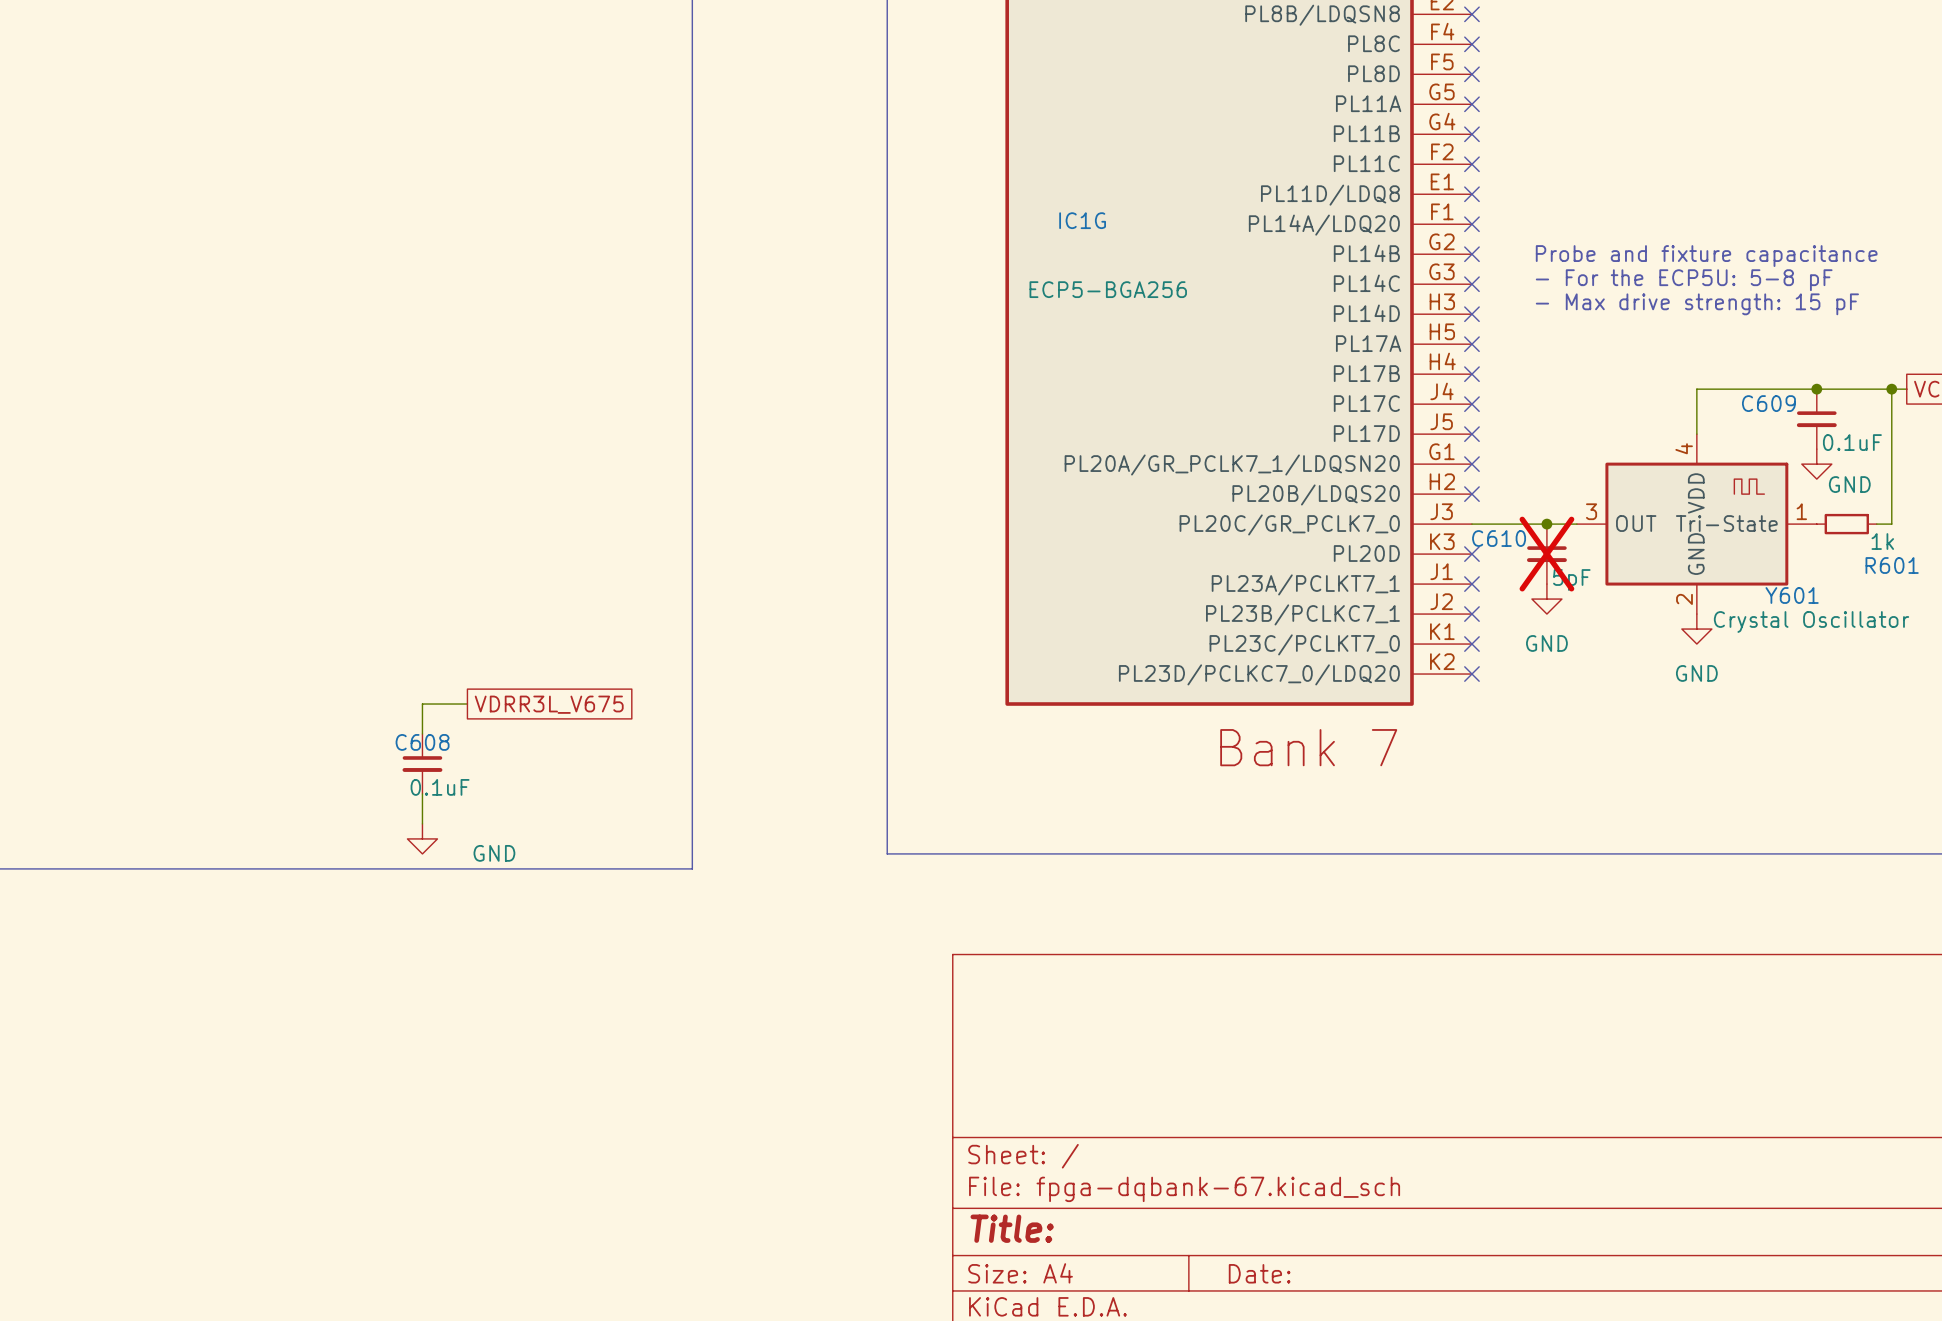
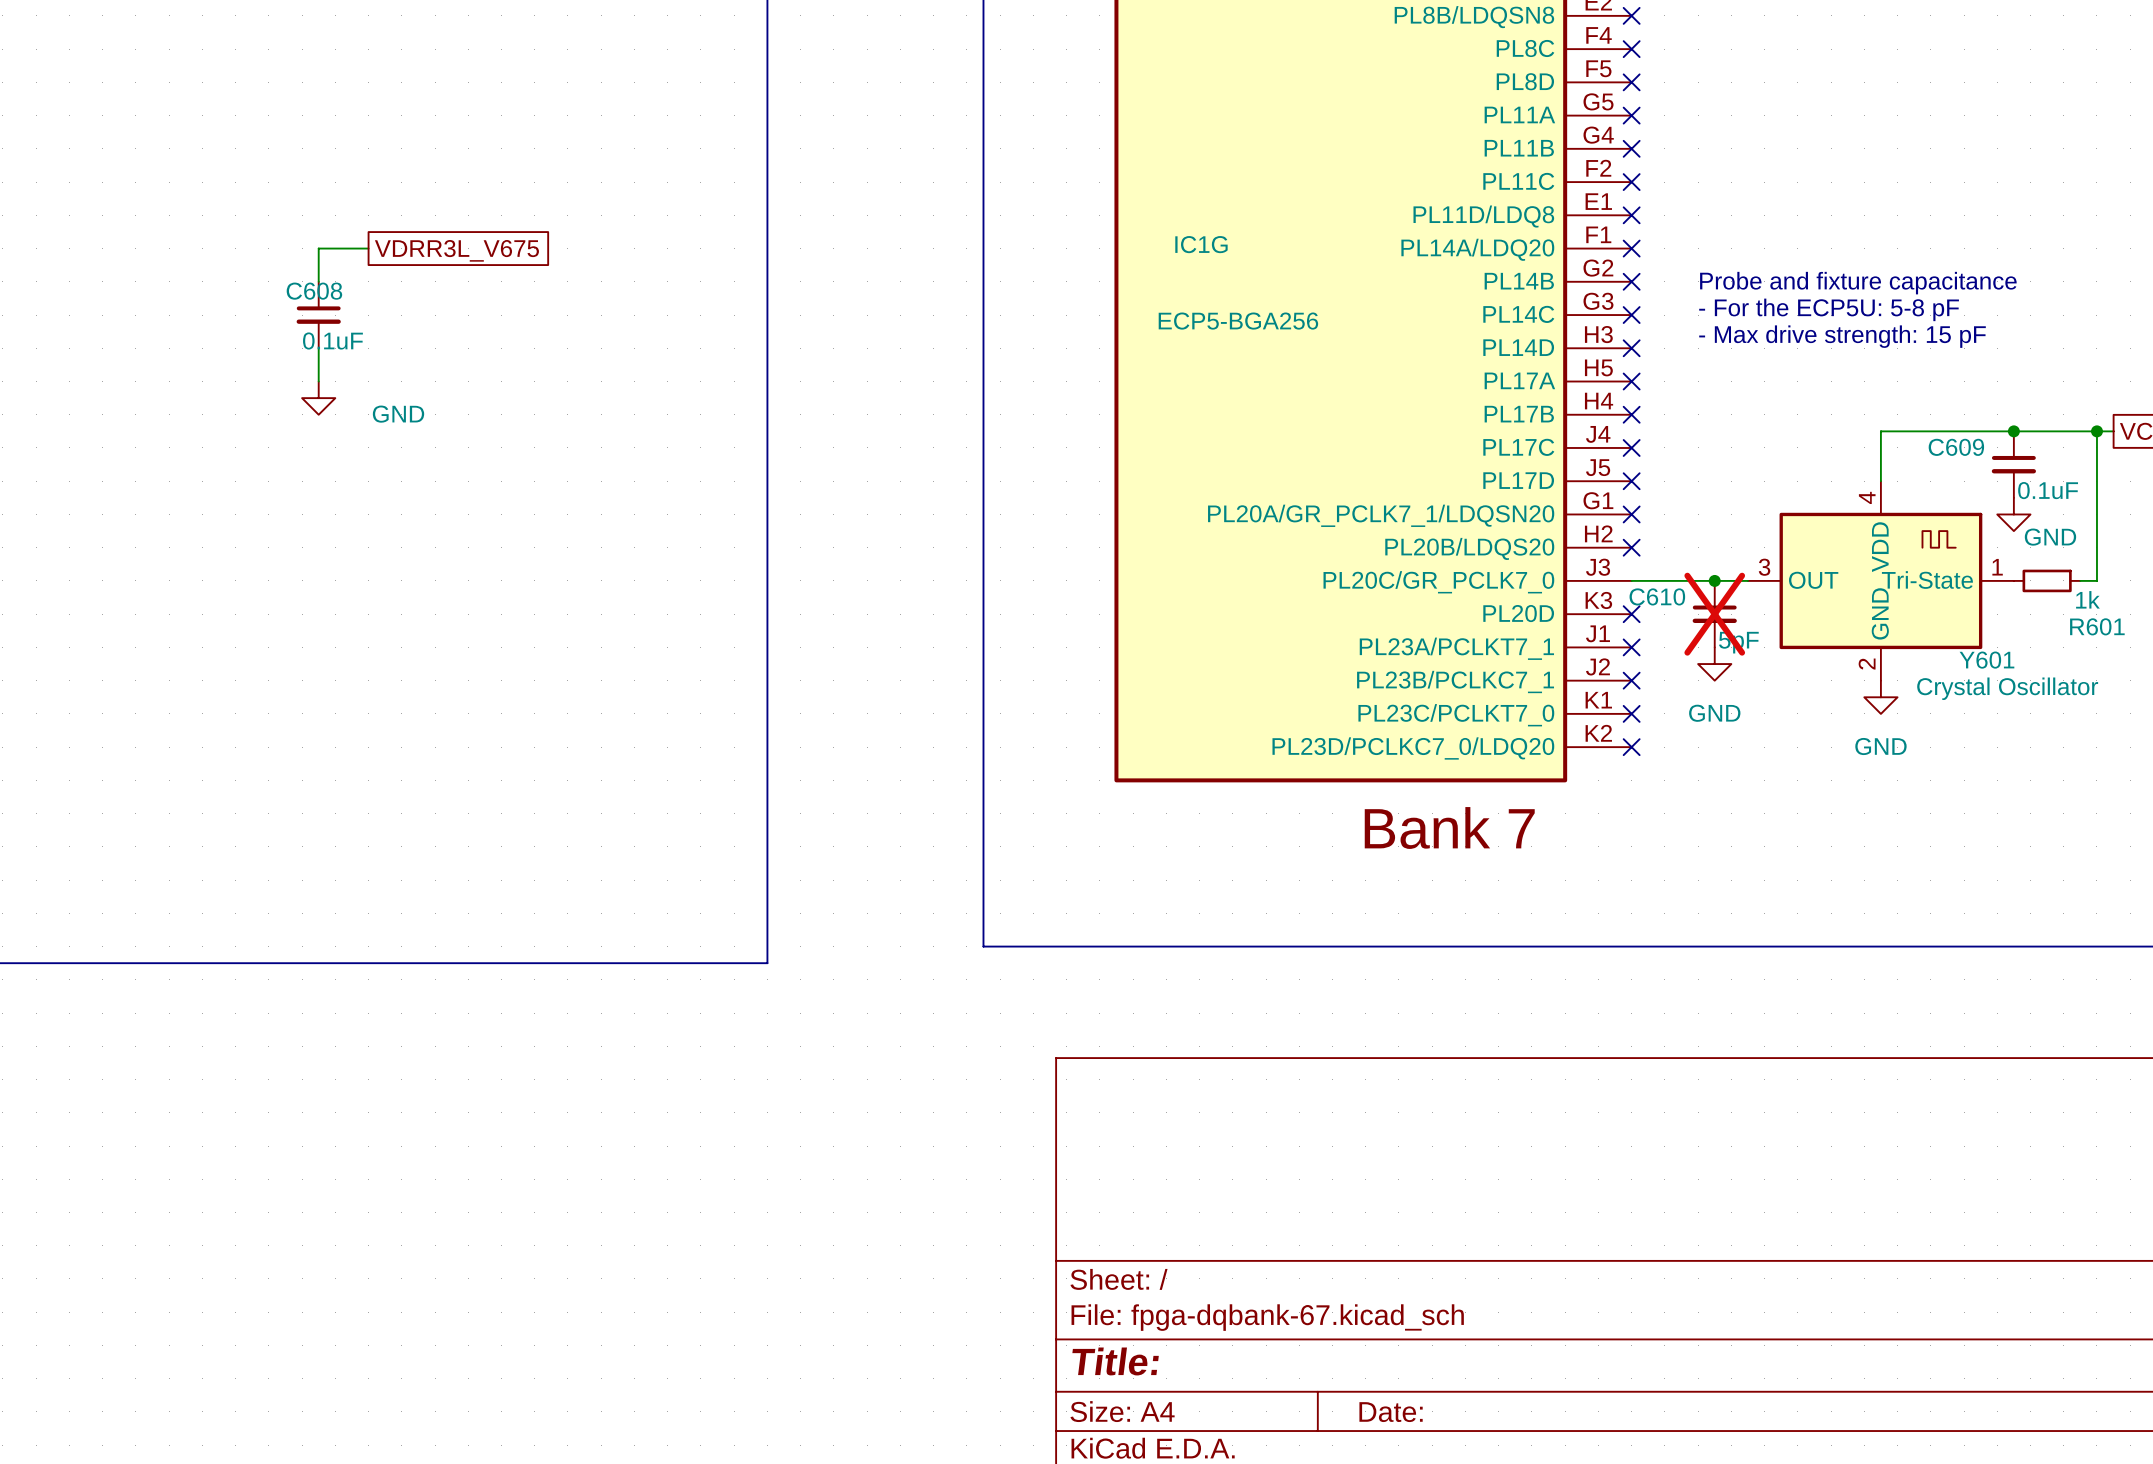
wire: none -> (368, 248) (318, 248) (318, 281)
global label: none -> VDRR3L_V675 (456, 250)
wire: none -> (318, 348) (318, 381)
power symbol: none -> GND (318, 398)
wire: (467, 704) (422, 704) (422, 733) -> none
global label: VDRR3L_V675 (549, 704) -> none
C608 position: (422, 763) -> (318, 315)
wire: (422, 793) (422, 823) -> none
power symbol: GND (422, 838) -> none

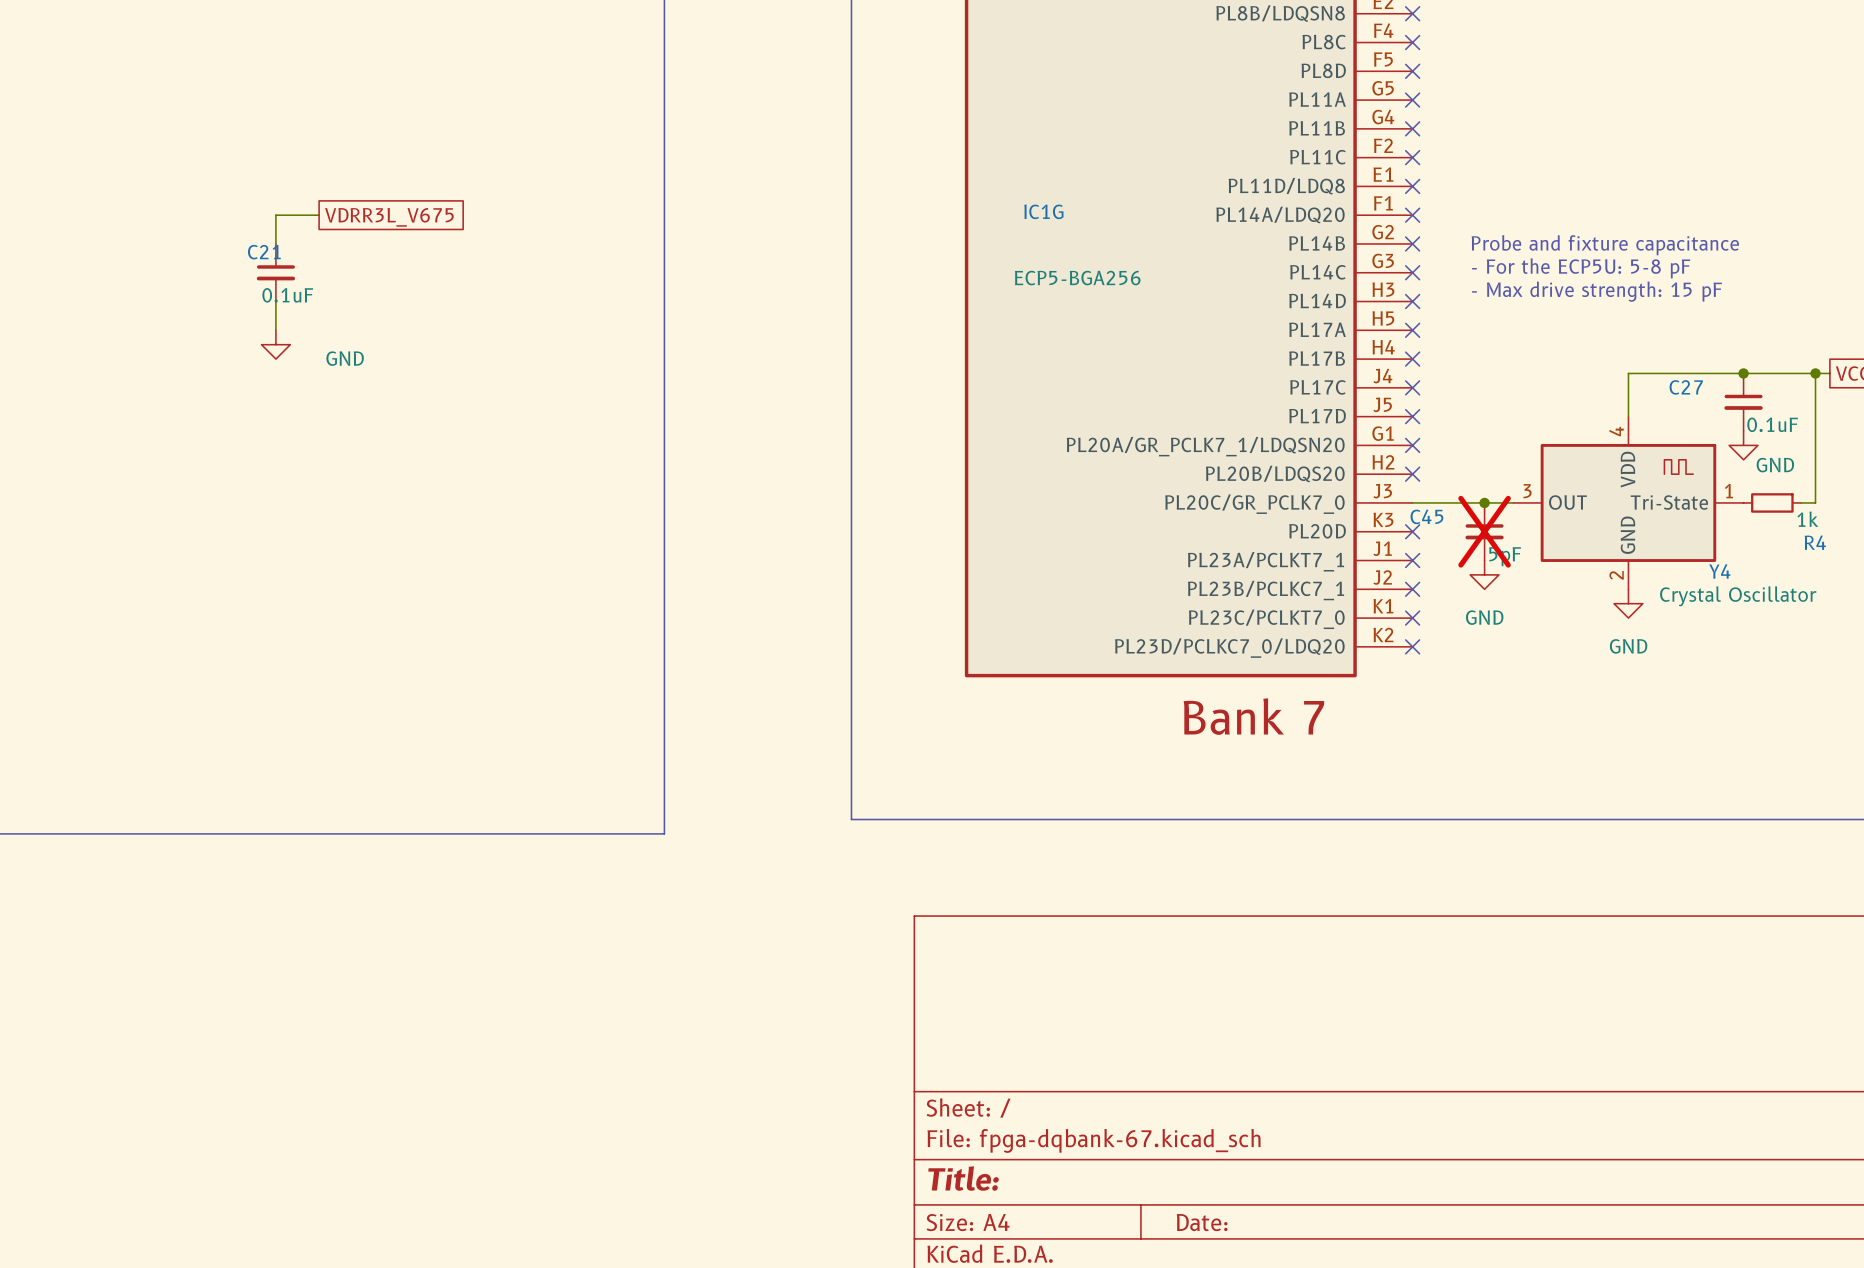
C608 name: C608 (314, 291) -> C21 (264, 252)
C609 name: C609 (1956, 447) -> C27 (1686, 387)
C610 name: C610 (1657, 596) -> C45 (1426, 516)
R601 name: R601 (2097, 626) -> R4 (1815, 542)
Y601 name: Y601 (1986, 660) -> Y4 (1719, 571)

